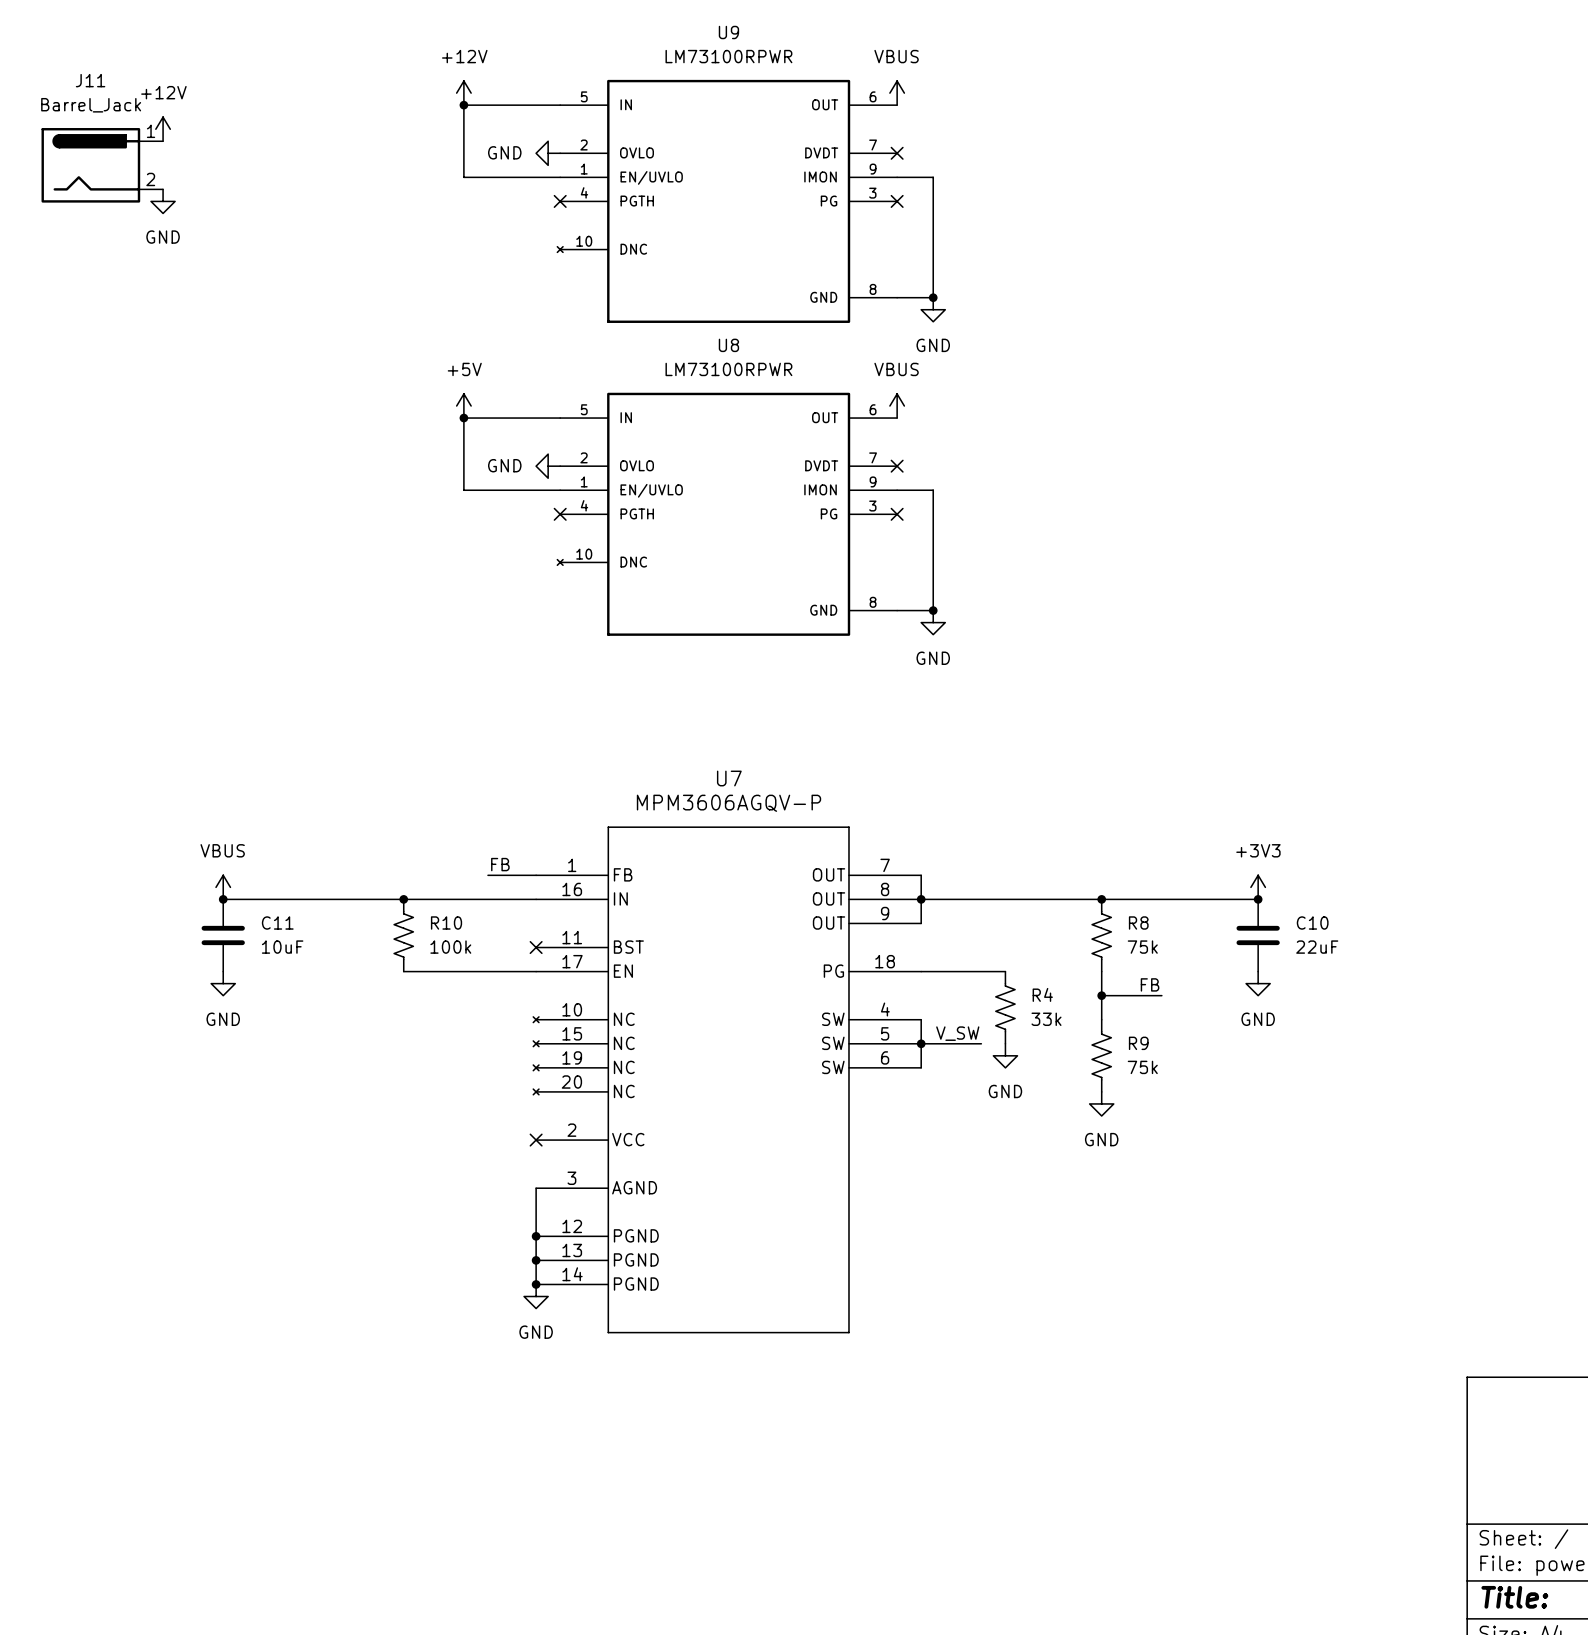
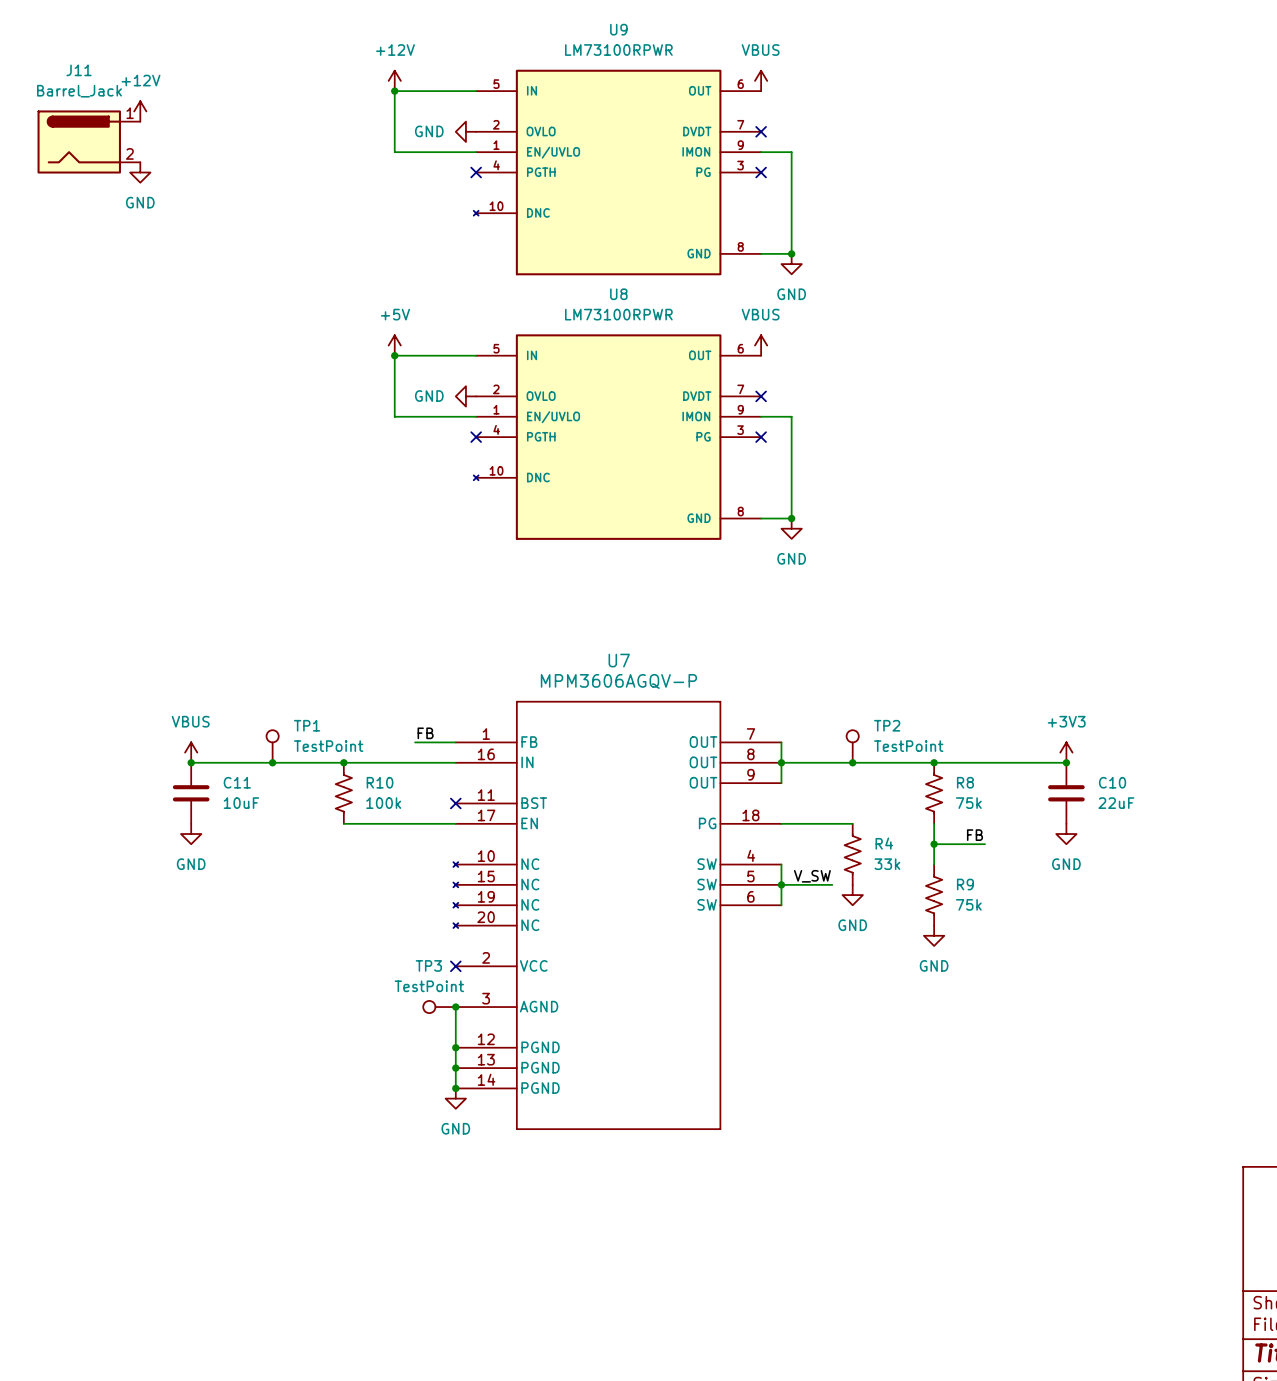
TP1: none -> TestPoint (272, 746)
TP2: none -> TestPoint (852, 746)
junction: none -> (272, 762)
junction: none -> (852, 762)
TP3: none -> TestPoint (439, 1007)
junction: none -> (455, 1007)

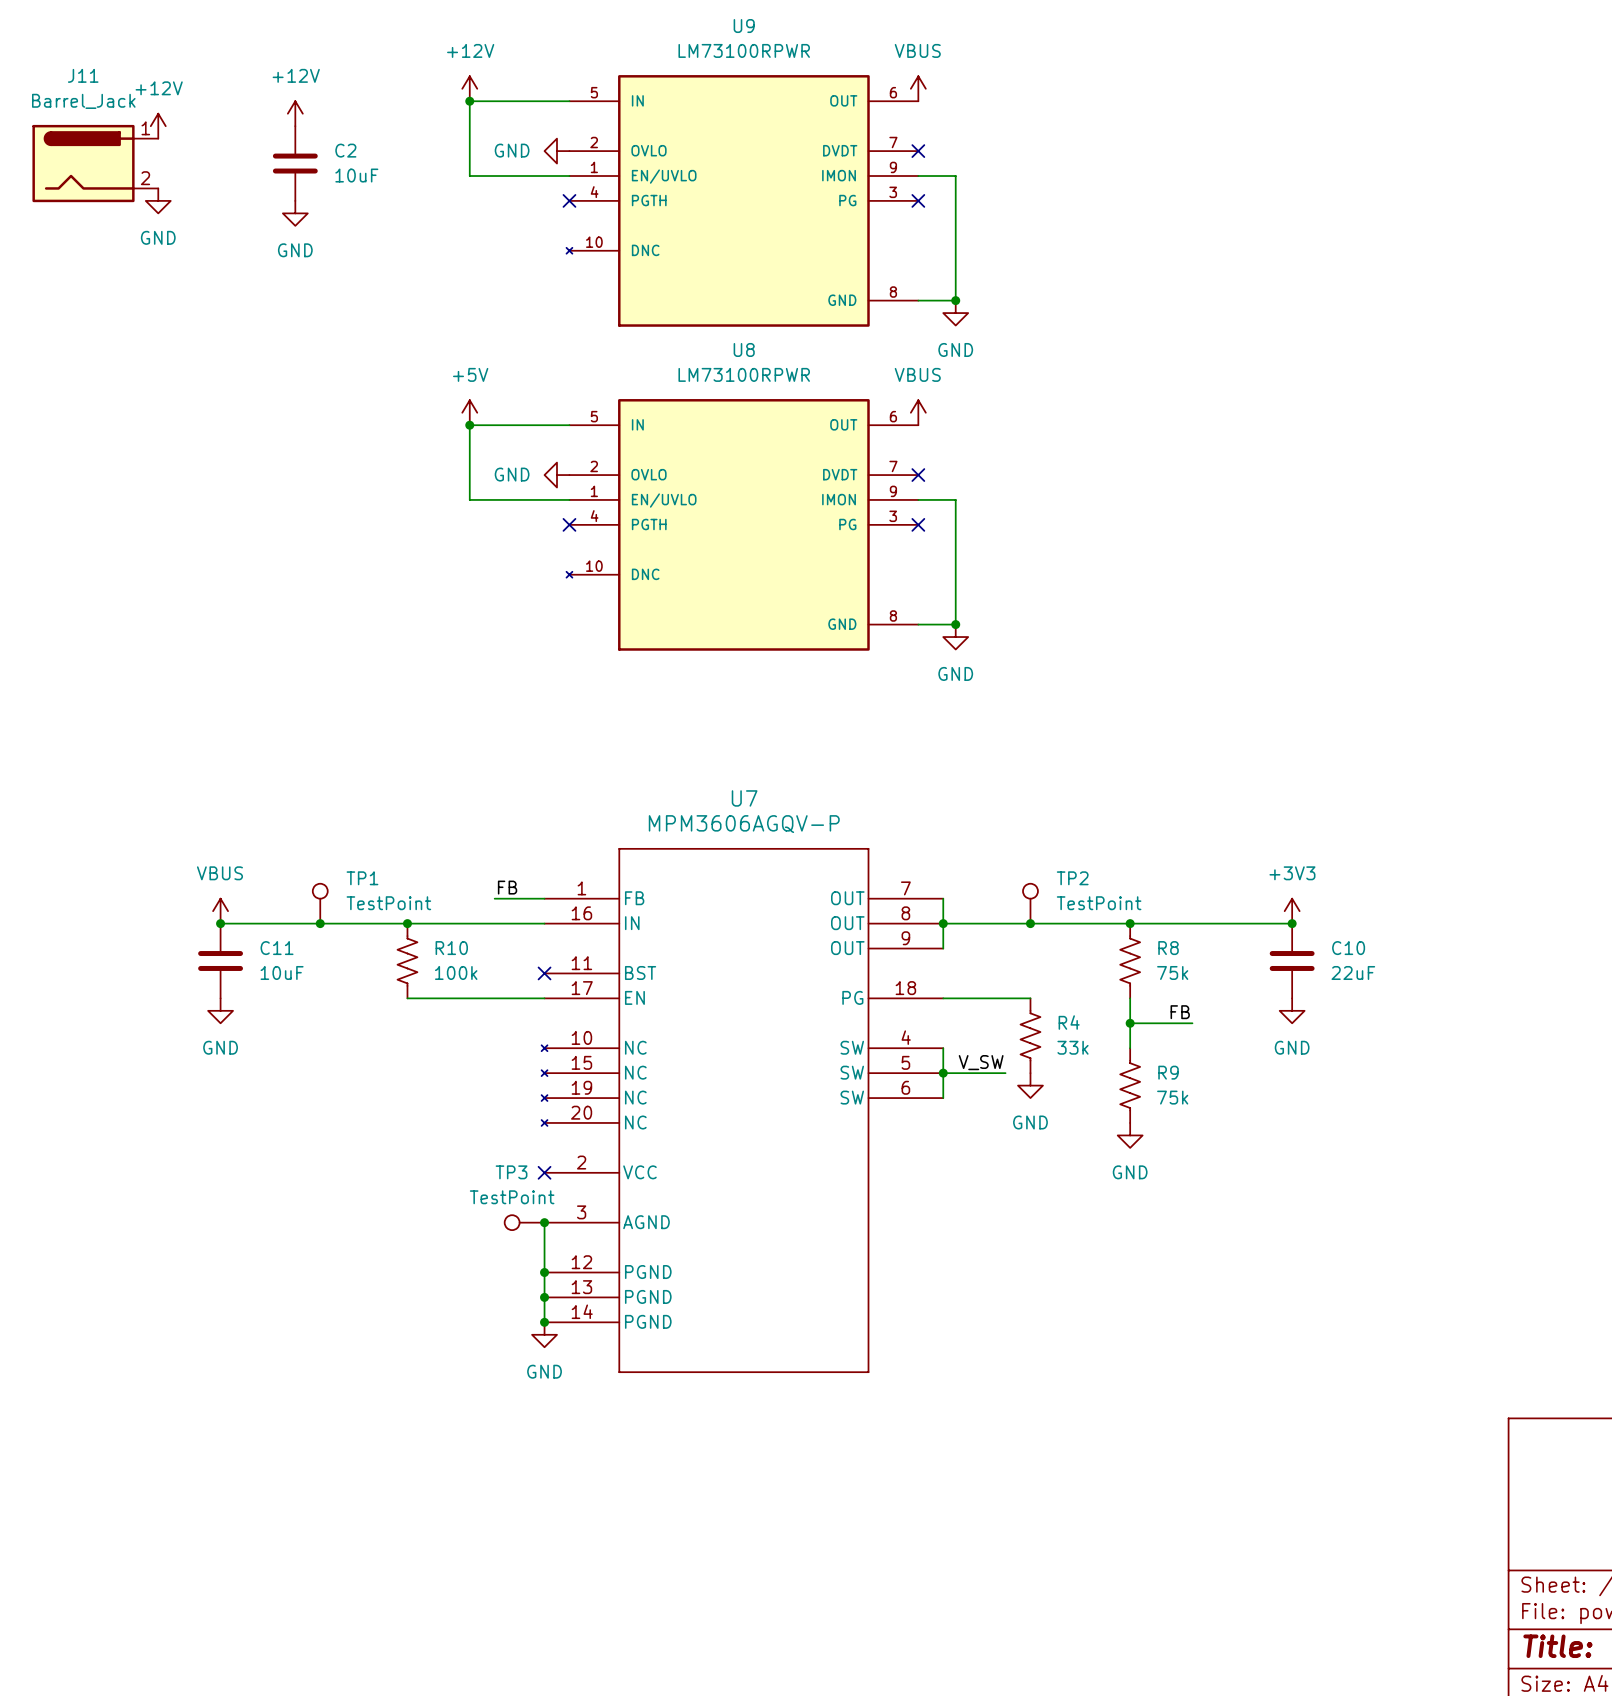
power symbol: none -> +12V (295, 113)
C2: none -> 10uF (295, 163)
power symbol: none -> GND (295, 213)

